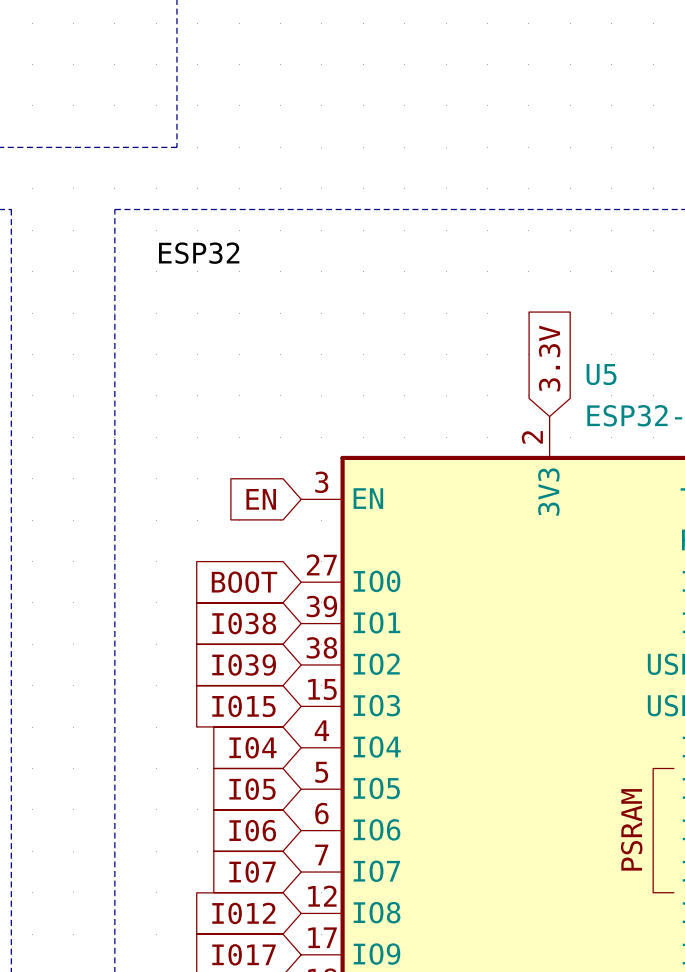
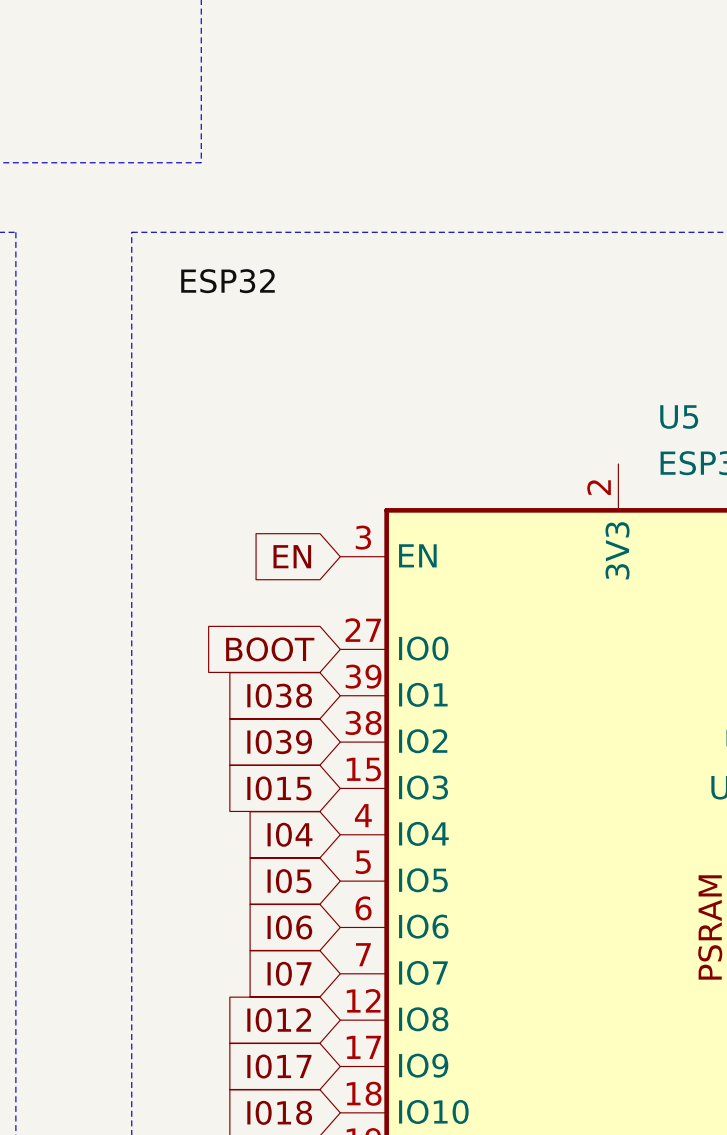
global label: 3.3V (549, 358) -> none

